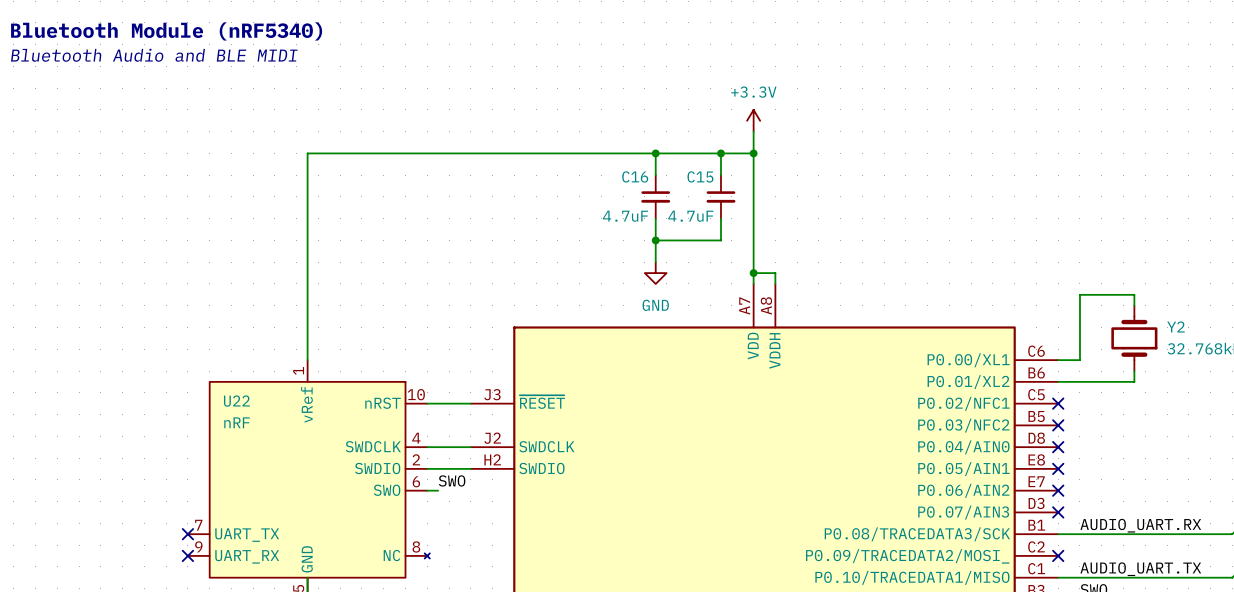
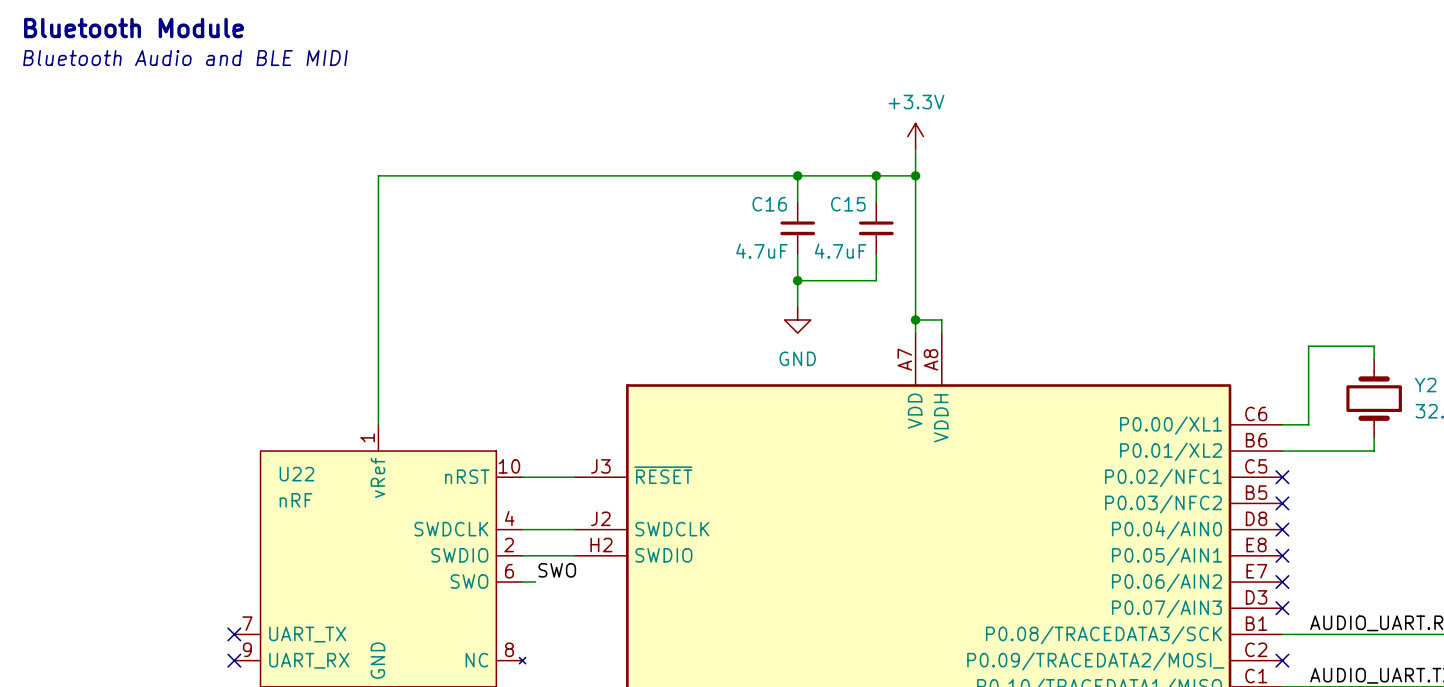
text: Bluetooth Module (nRF5340) (166, 31) -> Bluetooth Module (134, 28)

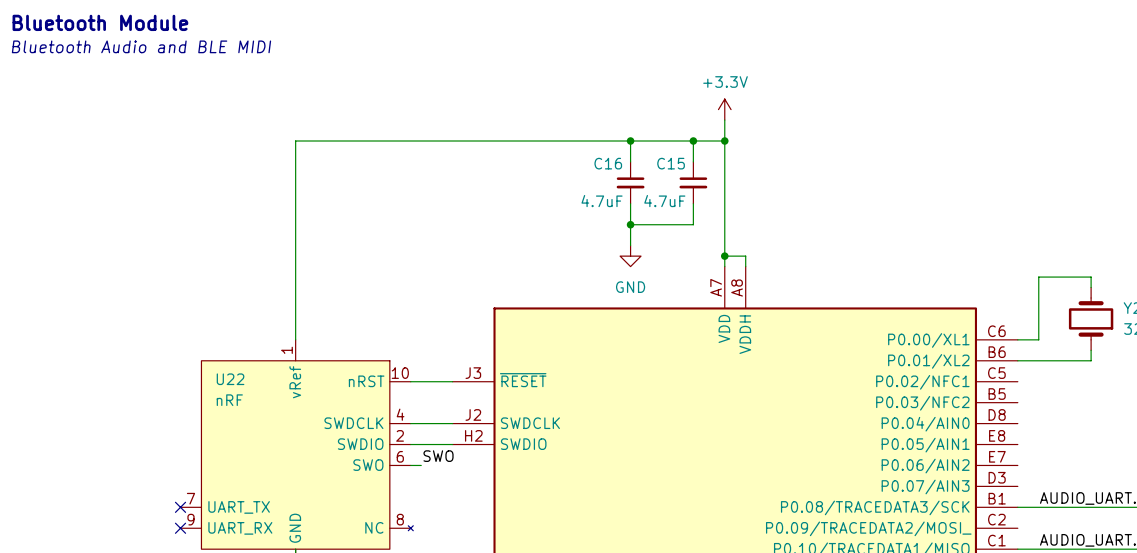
no-connect mark: (1282, 477) -> none
no-connect mark: (1282, 503) -> none
no-connect mark: (1282, 529) -> none
no-connect mark: (1282, 555) -> none
no-connect mark: (1282, 582) -> none
no-connect mark: (1282, 608) -> none
no-connect mark: (1282, 660) -> none

